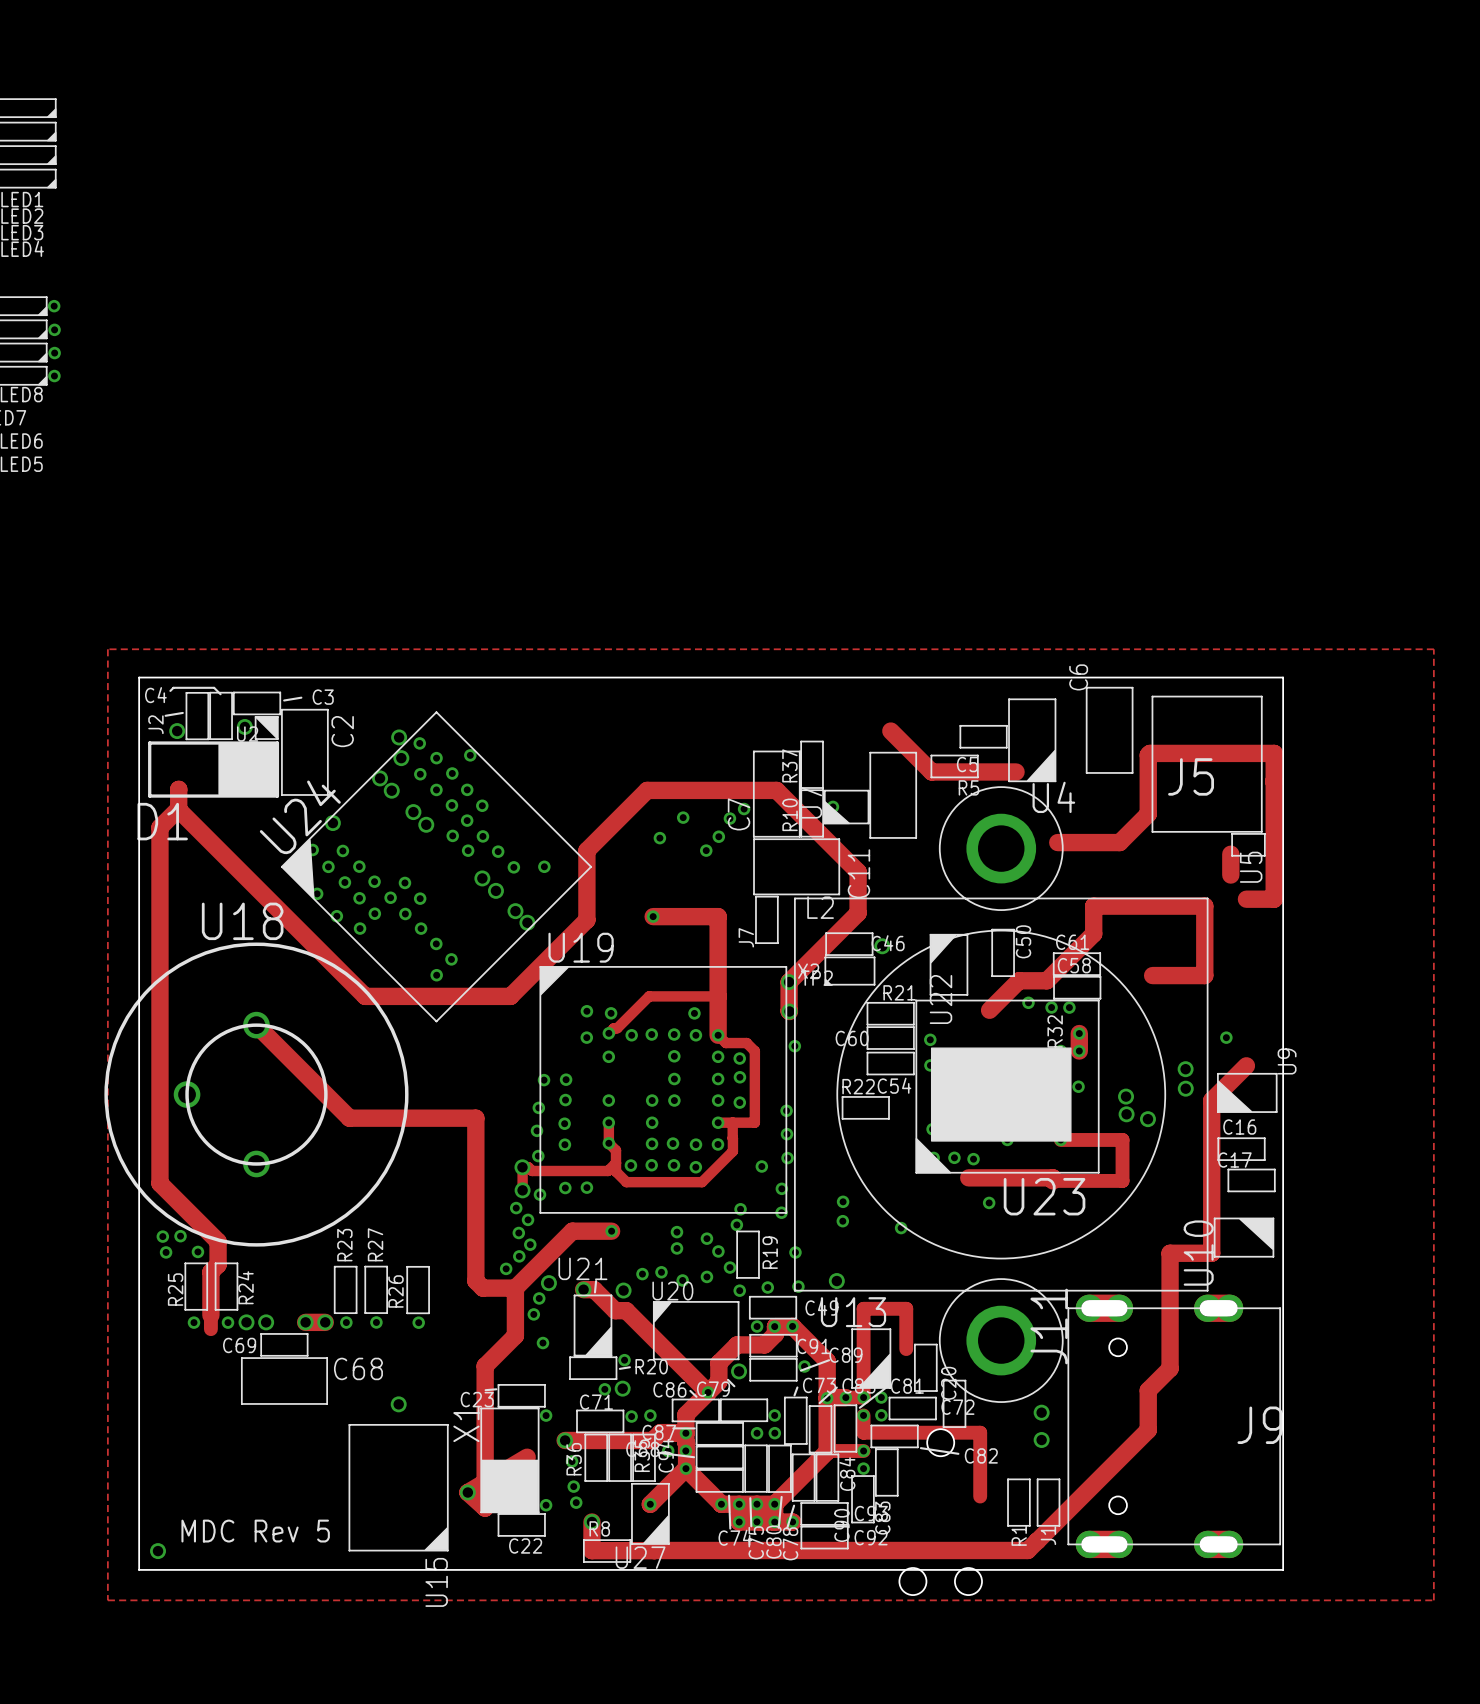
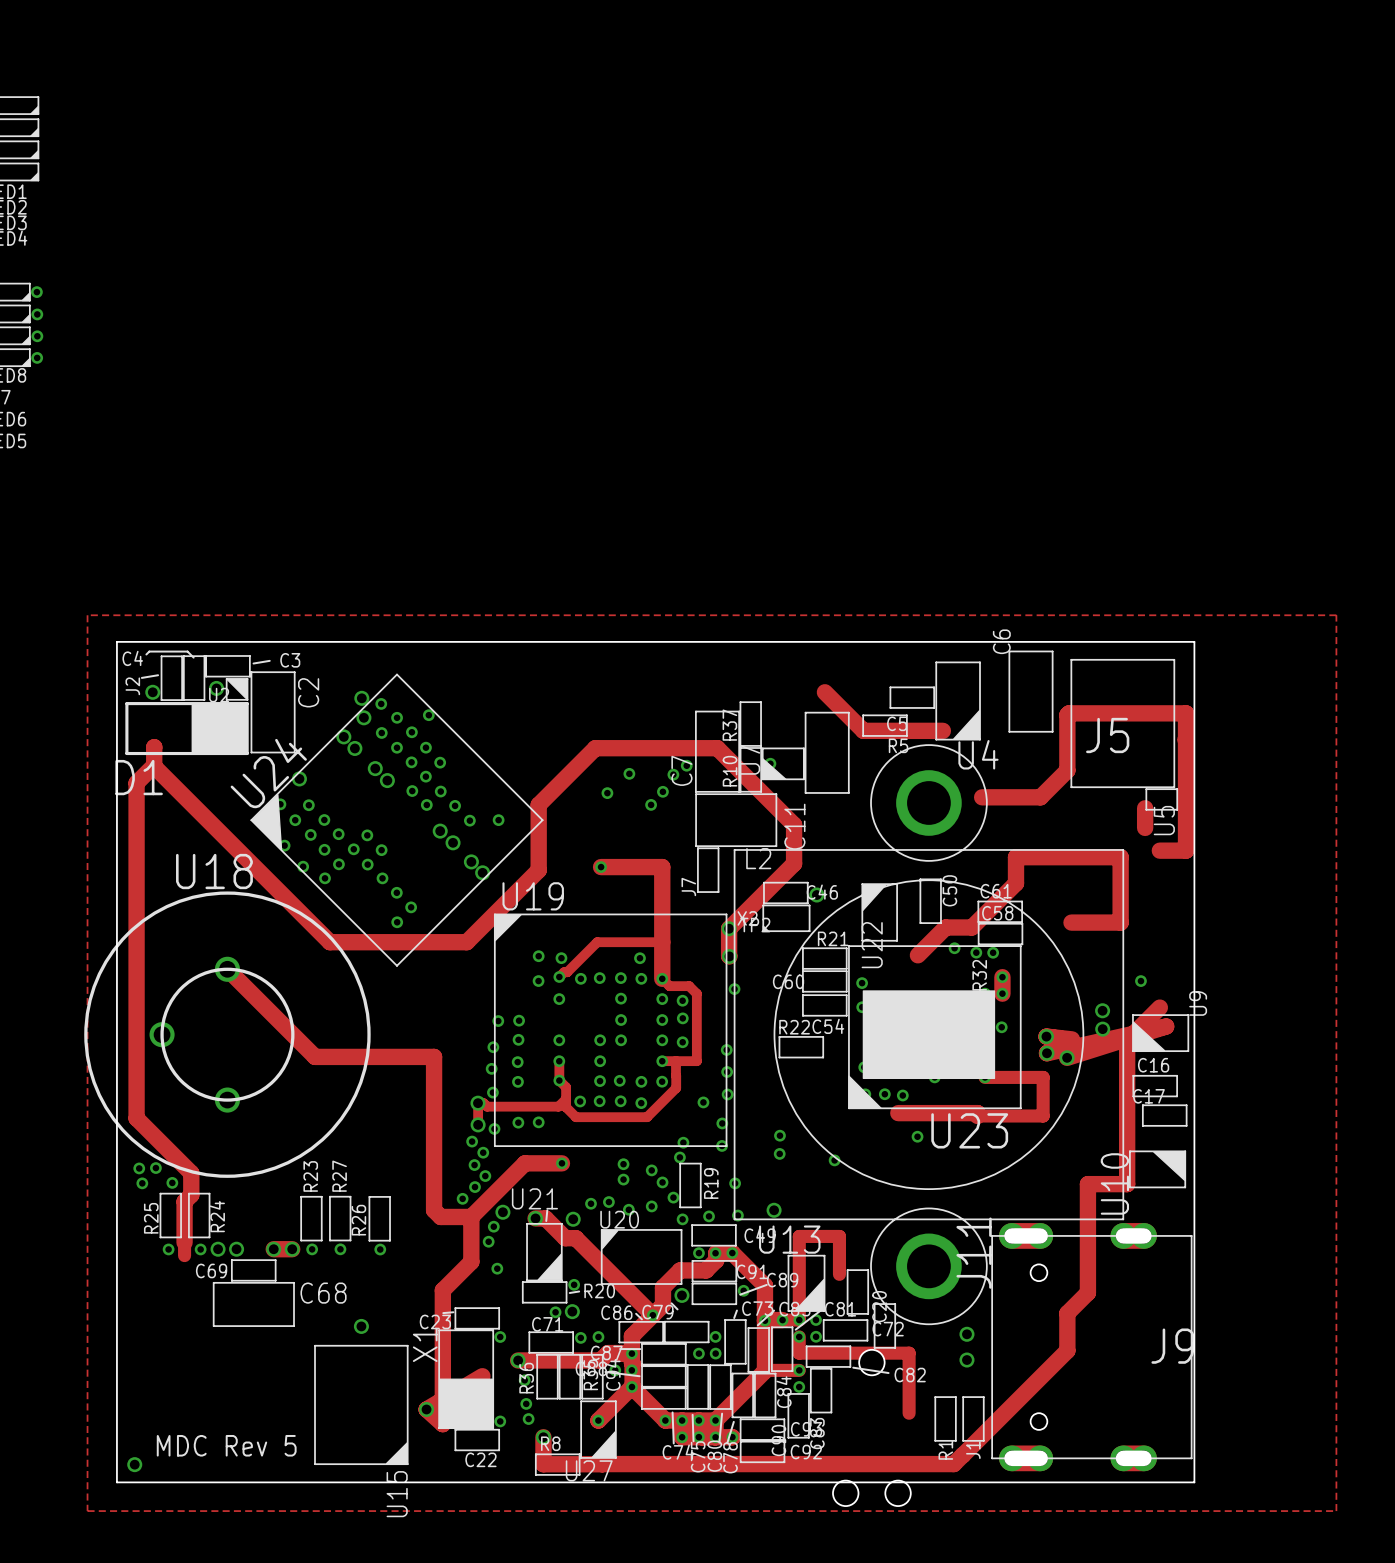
track: none -> (1071, 1039) (1046, 1036) (1062, 1039) (1046, 1053) (1166, 1026) (1067, 1057)

